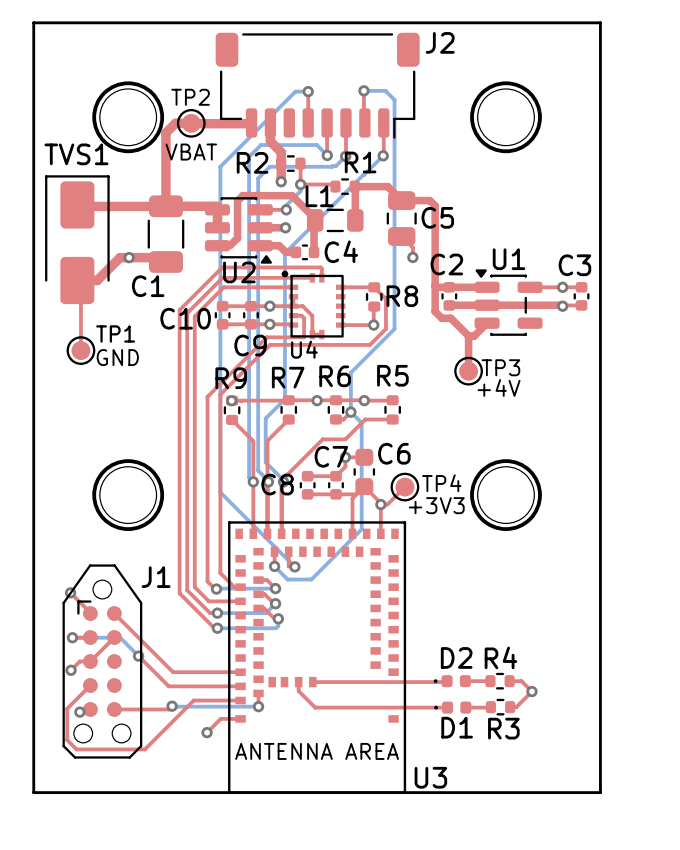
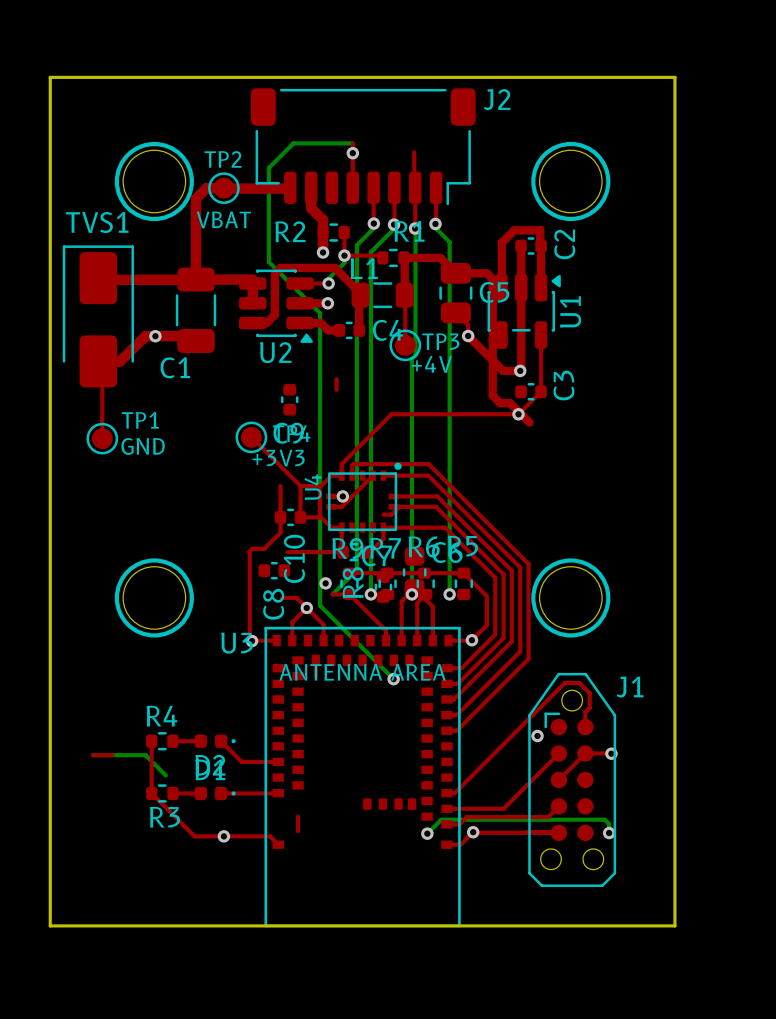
top track: none -> (352, 143) (352, 153)
bottom track: none -> (352, 143) (293, 143) (268, 167) (268, 262) (320, 313) (320, 605) (393, 679)
bottom track: (363, 90) (385, 90) (394, 99) (394, 329) (350, 372) (350, 412) (361, 422) (361, 529) (311, 579) (287, 579) (274, 566) -> none
via position: (363, 90) -> (415, 228)
bottom track: (308, 91) (295, 91) (220, 166) (220, 492) (294, 566) -> none
top track: none -> (415, 187) (415, 230)
bottom track: (327, 155) (316, 145) (260, 145) (249, 156) (249, 477) (253, 481) -> none
bottom track: (383, 155) (284, 253) (284, 399) (265, 418) (265, 462) (283, 481) -> none
bottom track: (345, 156) (335, 166) (331, 166) (269, 166) (258, 178) (258, 470) (268, 481) -> none
bottom track: none -> (373, 228) (356, 245) (356, 570) (332, 594)
bottom track: none -> (394, 228) (370, 252) (370, 594)
bottom track: none -> (415, 228) (415, 355) (411, 358) (411, 594)
bottom track: none -> (436, 228) (449, 242) (449, 594)
top track: none -> (521, 246) (521, 369) (503, 370) (468, 336)
top track: none -> (540, 245) (540, 229) (514, 230) (501, 242) (501, 287)
top track: none -> (541, 246) (541, 287)
top track: none -> (405, 295) (405, 345)
top track: none -> (541, 335) (541, 391) (518, 414) (391, 414) (341, 464) (341, 475) (331, 475) (319, 487)
top track: (312, 277) (222, 277) (187, 313) (187, 590) (210, 613) (217, 613) -> none
top track: (321, 277) (320, 267) (222, 267) (179, 310) (179, 593) (214, 628) (217, 628) -> none
top track: (435, 285) (487, 287) -> none
top track: (293, 287) (223, 287) (194, 316) (194, 587) (208, 601) (240, 601) -> none
top track: (340, 287) (374, 287) (385, 299) (385, 328) (369, 344) (270, 344) (220, 394) (220, 573) (234, 587) (240, 587) -> none
top track: (530, 287) (581, 287) -> none
via: (562, 287) -> none
via: none -> (520, 370)
R8 rotation: 0° (374, 296) -> 90° clockwise (353, 552)
R8 position: (374, 296) -> (353, 552)
C2 rotation: 0° (449, 296) -> 90° clockwise (531, 246)
C2 position: (449, 296) -> (531, 246)
C3 rotation: 0° (581, 296) -> 90° clockwise (531, 391)
C3 position: (581, 296) -> (531, 391)
U1 rotation: 0° (508, 302) -> 90° clockwise (524, 311)
U1 position: (508, 302) -> (524, 311)
U4 rotation: 0° (313, 305) -> 90° clockwise (363, 497)
U4 position: (313, 305) -> (363, 497)
top track: (449, 305) (581, 305) -> none
top track: (222, 306) (302, 306) (312, 315) (312, 334) (321, 334) -> none
via: (269, 306) -> none
via: (562, 306) -> none
top track: (373, 307) (373, 325) (340, 325) -> none
C10 rotation: 0° (222, 315) -> 90° clockwise (290, 517)
C10 position: (222, 315) -> (290, 517)
top track: (293, 315) (301, 315) (304, 318) (304, 337) (266, 337) (207, 396) (207, 581) (216, 589) -> none
C10 name position: C10 (185, 318) -> C10 (294, 558)
top track: (487, 323) (474, 336) (468, 336) (468, 371) -> none
top track: (222, 324) (292, 324) -> none
via: (269, 324) -> none
via: (373, 325) -> none
via: none -> (518, 414)
top track: none -> (251, 437) (300, 486)
TP3 position: (468, 371) -> (405, 345)
top track: none -> (352, 475) (353, 464) (428, 464) (528, 563) (528, 658) (456, 730) (446, 730)
top track: none -> (373, 475) (341, 506) (331, 506)
top track: none -> (383, 475) (428, 475) (520, 567) (520, 651) (456, 715) (446, 715)
top track: none -> (280, 486) (280, 532) (264, 548) (252, 548) (249, 551)
top track: none -> (300, 486) (300, 517) (319, 516)
top track: none -> (300, 486) (319, 487)
top track: none -> (319, 487) (319, 516)
R6 footprint: [327, 395, 345, 425] -> [416, 567, 435, 601]
via: (231, 400) -> none
top track: (288, 400) (392, 400) -> none
via position: (317, 400) -> (342, 496)
via: (364, 400) -> none
top track: none -> (393, 496) (437, 496) (511, 570) (511, 641) (453, 699) (446, 699)
R7 position: (288, 409) -> (387, 583)
R5 position: (392, 409) -> (463, 583)
R9 position: (232, 410) -> (349, 583)
top track: none -> (393, 506) (436, 506) (503, 574) (503, 638) (457, 683) (446, 683)
via: (350, 412) -> none
top track: (232, 419) (253, 441) (253, 517) -> (306, 607) (292, 622)
top track: (288, 419) (267, 440) (267, 533) -> none
top track: (392, 419) (365, 419) (345, 439) (322, 439) (281, 480) (281, 519) -> (282, 597) (296, 597) (323, 624)
top track: none -> (319, 516) (331, 527) (341, 527) (341, 550)
top track: none -> (249, 551) (249, 638) (252, 641) (276, 640)
top track: none -> (287, 552) (343, 552)
top track: none -> (364, 552) (370, 552) (383, 538) (383, 527) (445, 527) (495, 577) (495, 634) (461, 668) (446, 668)
via: (345, 457) -> none
top track: (364, 457) (345, 457) (345, 466) (335, 476) (307, 476) -> none
top track: none -> (349, 573) (463, 573) (486, 596) (486, 625) (471, 640) (448, 640)
via: (253, 481) -> none
via: (268, 481) -> none
C8 name position: C8 (277, 484) -> C8 (273, 604)
C8 rotation: 0° (307, 485) -> 90° clockwise (274, 570)
C8 position: (307, 485) -> (274, 570)
top track: (404, 487) (387, 504) (380, 504) -> none
TP4 position: (404, 487) -> (251, 437)
top track: none -> (332, 594) (349, 594)
top track: none -> (349, 594) (386, 630) (386, 640)
via: none -> (370, 594)
top track: none -> (411, 594) (425, 594) (417, 602) (417, 640)
via: none -> (411, 594)
via: none -> (449, 594)
top track: (307, 494) (356, 494) -> none
via: none -> (306, 607)
via: (380, 504) -> none
U3 footprint: [228, 521, 407, 794] -> [264, 626, 461, 928]
via: none -> (471, 640)
via: none -> (252, 641)
top track: (288, 551) (288, 566) (294, 566) -> none
via: (274, 566) -> none
via: (294, 566) -> none
via: none -> (393, 679)
top track: (258, 580) (267, 580) (275, 588) -> none
bottom track: (275, 588) (216, 589) -> none
via: (275, 588) -> none
via: (216, 589) -> none
top track: (70, 592) (90, 612) -> none
via: (70, 592) -> none
top track: (258, 594) (264, 594) (275, 603) -> none
bottom track: (275, 603) (266, 613) (217, 613) -> none
via: (275, 603) -> none
top track: (258, 608) (264, 608) (274, 618) (278, 618) -> none
top track: none -> (585, 727) (585, 712) (589, 707) (589, 693) (579, 683) (564, 683) (454, 793) (446, 793)
top track: (114, 613) (173, 672) (240, 672) -> (221, 793) (277, 793)
via: (217, 613) -> none
bottom track: (278, 618) (278, 625) (276, 628) (217, 628) -> none
via: (278, 618) -> none
via: none -> (537, 736)
top track: none -> (172, 741) (200, 741)
top track: none -> (221, 741) (241, 761) (278, 761)
via: (217, 628) -> none
top track: none -> (558, 753) (503, 808) (446, 808)
top track: none -> (611, 753) (585, 753) (558, 779)
via: none -> (611, 753)
via: (72, 637) -> none
top track: (114, 637) (90, 661) (79, 661) (71, 670) -> none
top track: (138, 656) (168, 686) (240, 686) -> none
via: (138, 656) -> none
J1 position: (102, 661) -> (572, 779)
via: (71, 670) -> none
D2 rotation: 0° (452, 681) -> 180° (215, 741)
D2 position: (452, 681) -> (215, 741)
top track: (465, 681) (490, 681) -> (172, 793) (200, 793)
R4 position: (500, 681) -> (162, 741)
top track: (509, 681) (521, 681) (531, 691) (516, 707) (510, 707) -> none
top track: (298, 682) (298, 691) (315, 707) (417, 707) -> (446, 844) (460, 844) (473, 832)
top track: (312, 682) (444, 682) -> none
top track: none -> (558, 806) (548, 817) (466, 817) (459, 824) (446, 824)
top track: (90, 685) (67, 708) (67, 740) (76, 749) (144, 749) (193, 700) (240, 700) -> none
via position: (531, 691) -> (609, 833)
top track: (172, 706) (168, 709) (114, 709) -> none
bottom track: (172, 706) (258, 706) -> none
via: (172, 706) -> none
via: (258, 706) -> none
via: none -> (473, 832)
top track: (419, 707) (447, 707) -> (475, 832) (558, 832)
D1 rotation: 0° (452, 707) -> 180° (215, 793)
D1 position: (452, 707) -> (215, 793)
R3 position: (500, 707) -> (162, 793)
via: none -> (427, 833)
bottom track: none -> (609, 833) (609, 824) (604, 819) (441, 819) (427, 833)
via: none -> (223, 836)
via: (79, 712) -> none
top track: (240, 718) (220, 718) (207, 732) -> (278, 844) (269, 836) (194, 836) (151, 793) (151, 741)
via: (207, 732) -> none
U3 name position: U3 (430, 777) -> U3 (237, 643)

